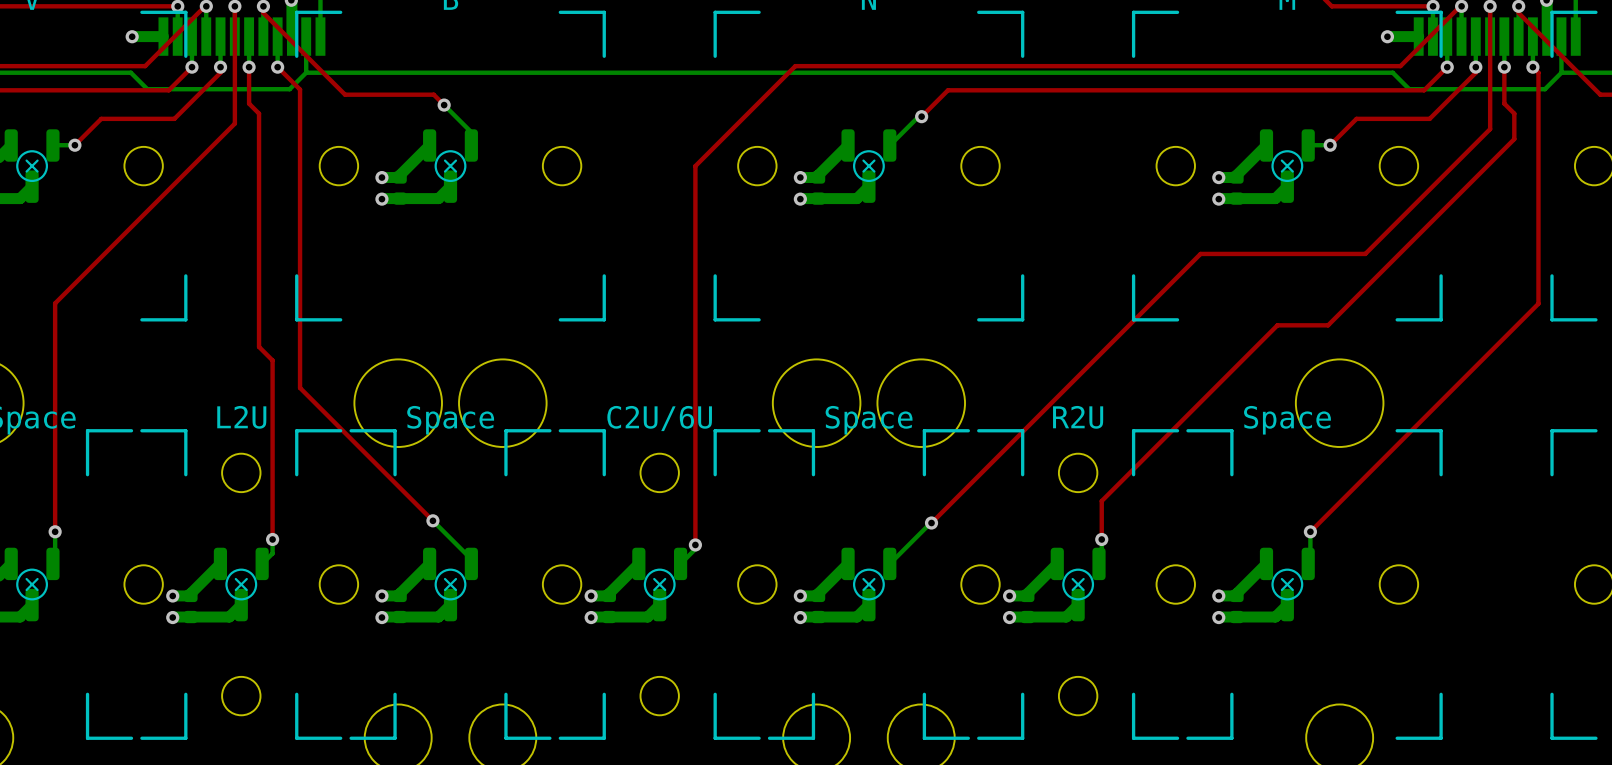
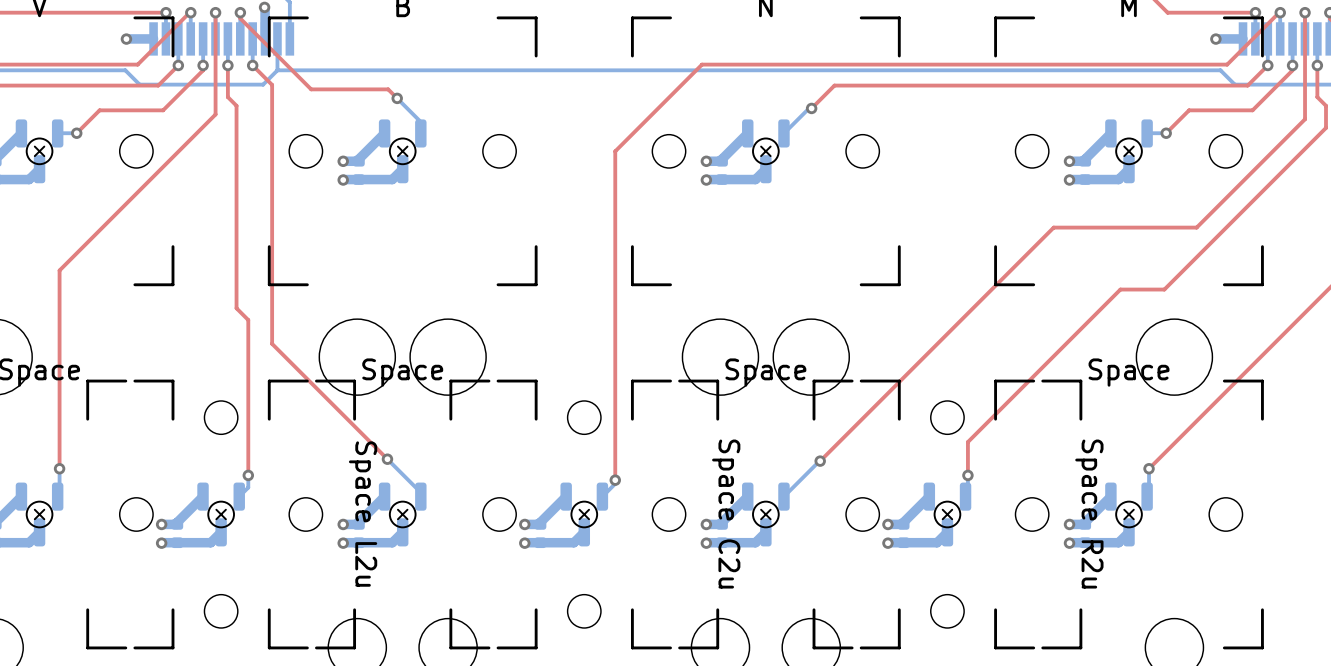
part value: L2U (241, 417) -> Space L2u (363, 514)
part value: R2U (1078, 417) -> Space R2u (1089, 514)
part value: C2U/6U (659, 418) -> Space C2u (726, 514)

